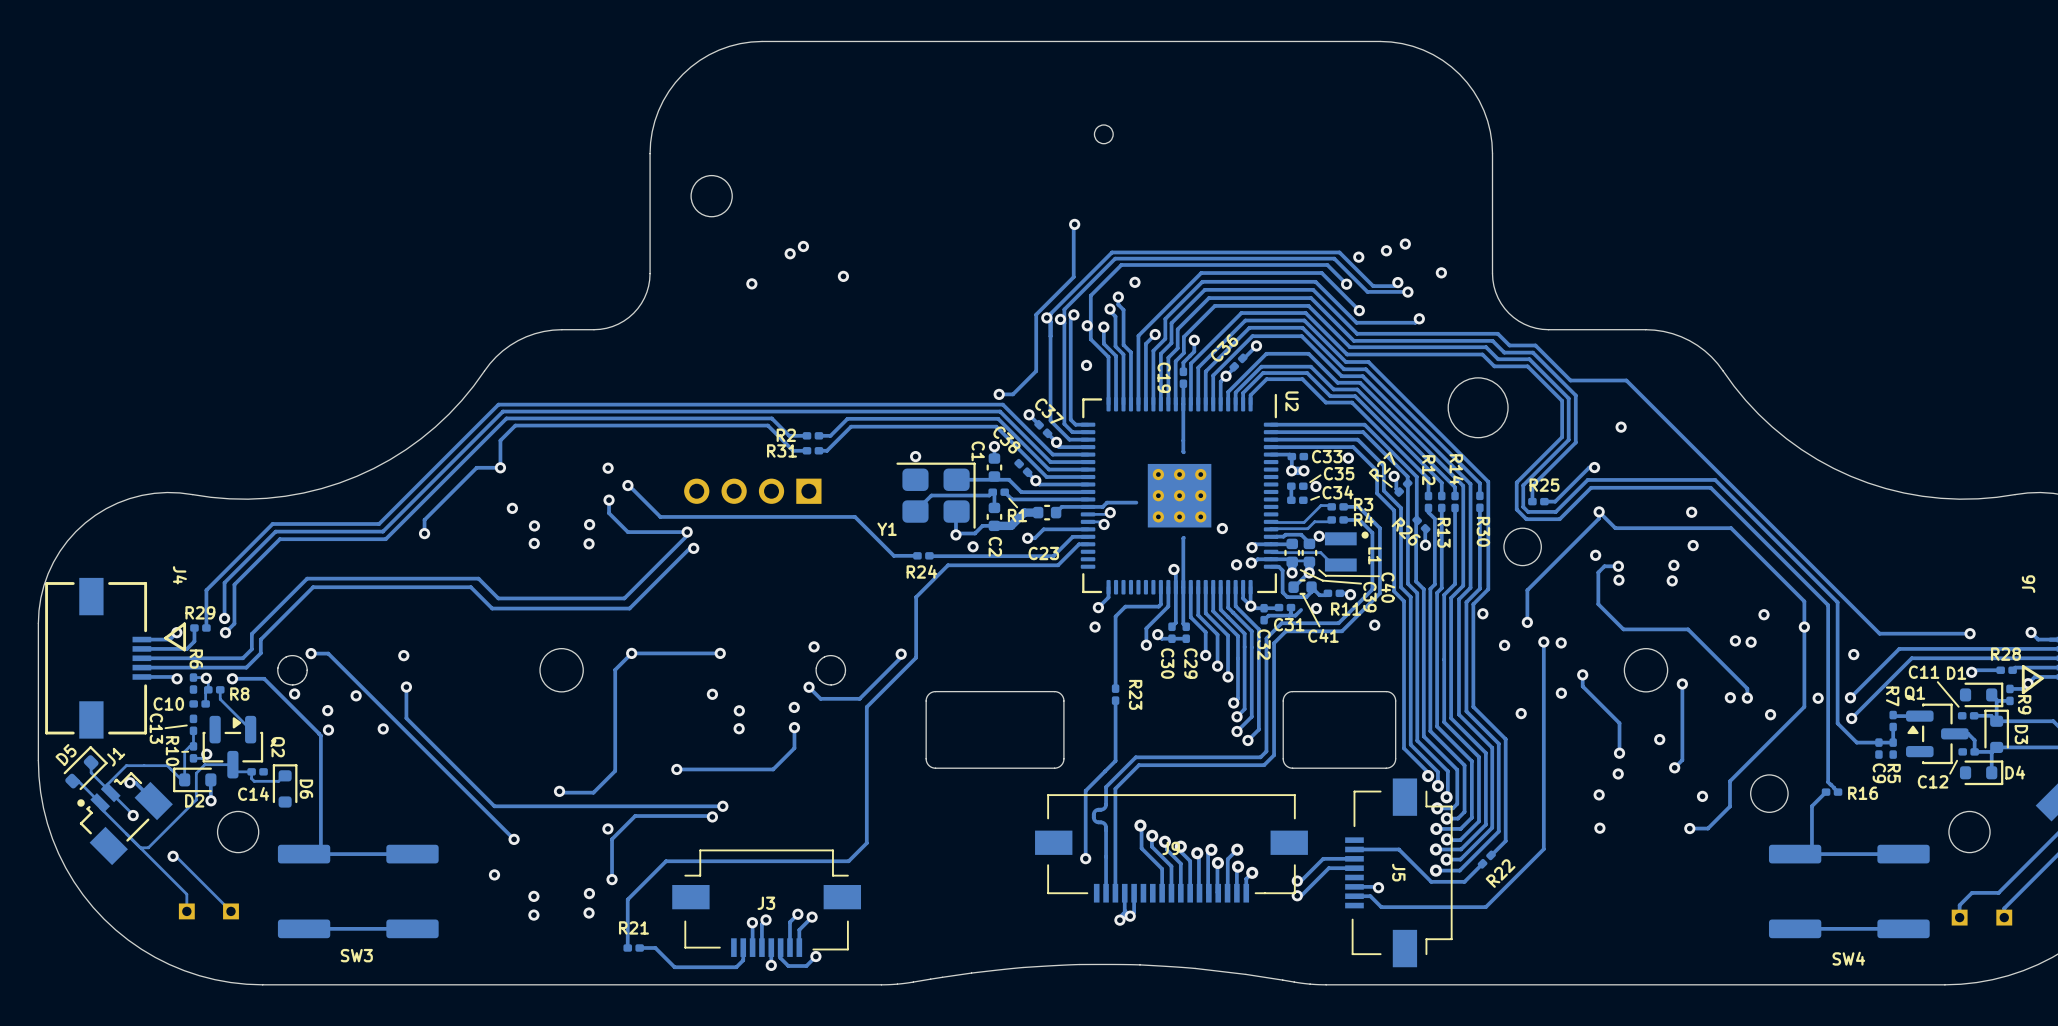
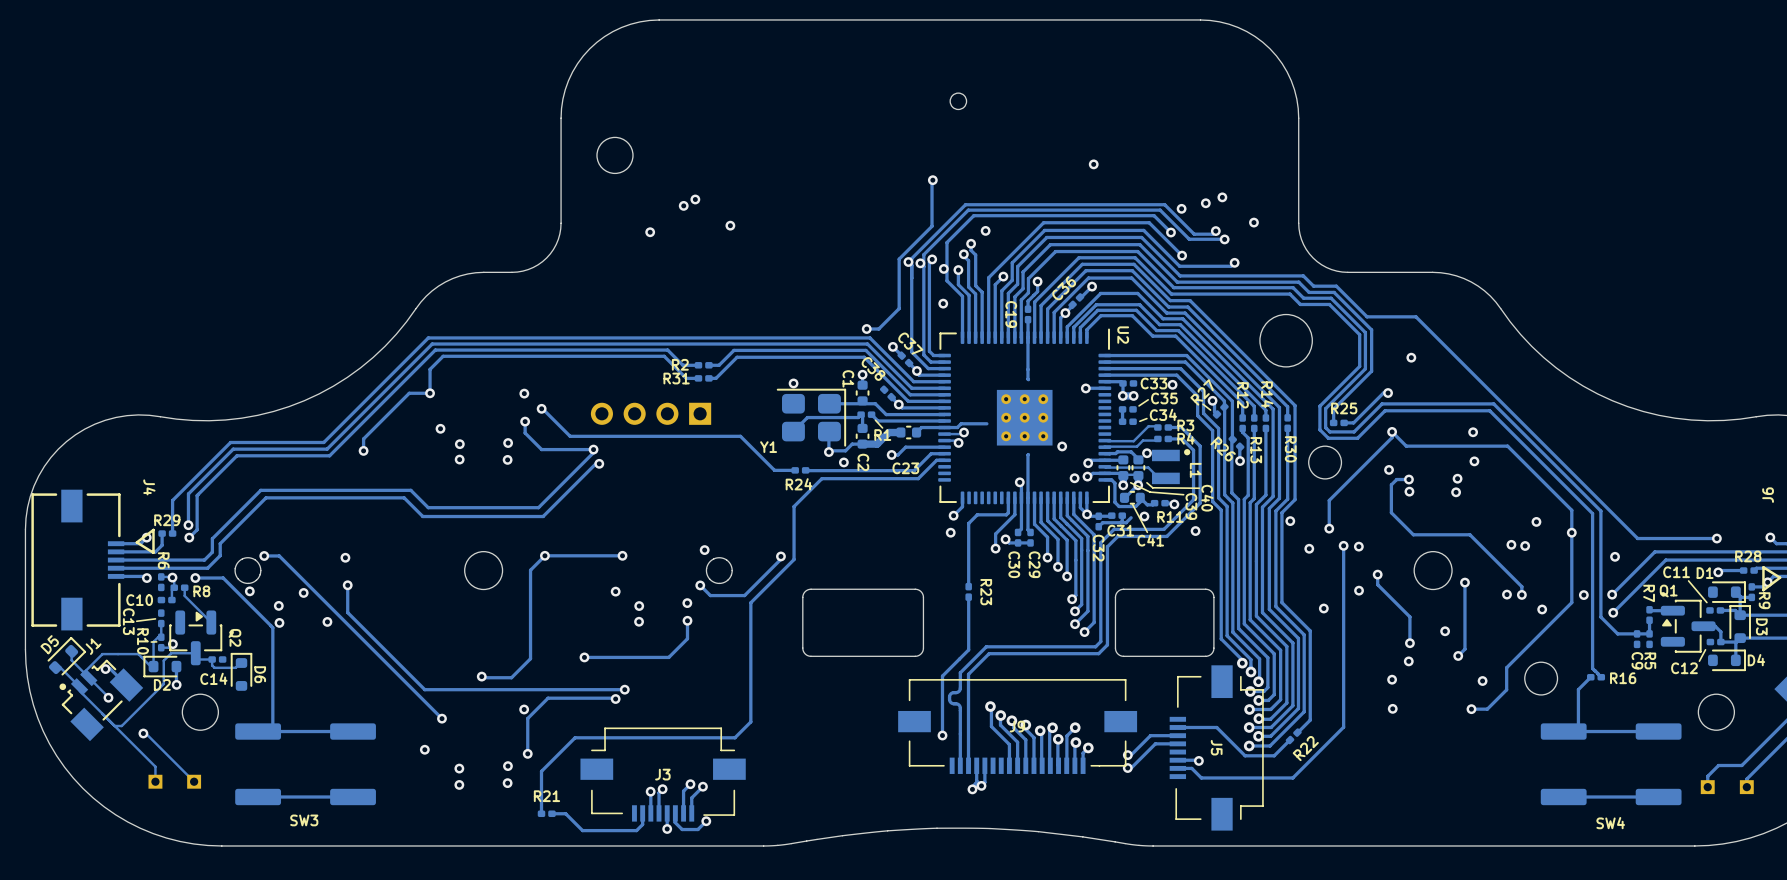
via: none -> (1093, 164)
track: none -> (1104, 388) (1086, 388)
via position: (1315, 486) -> (1085, 388)

